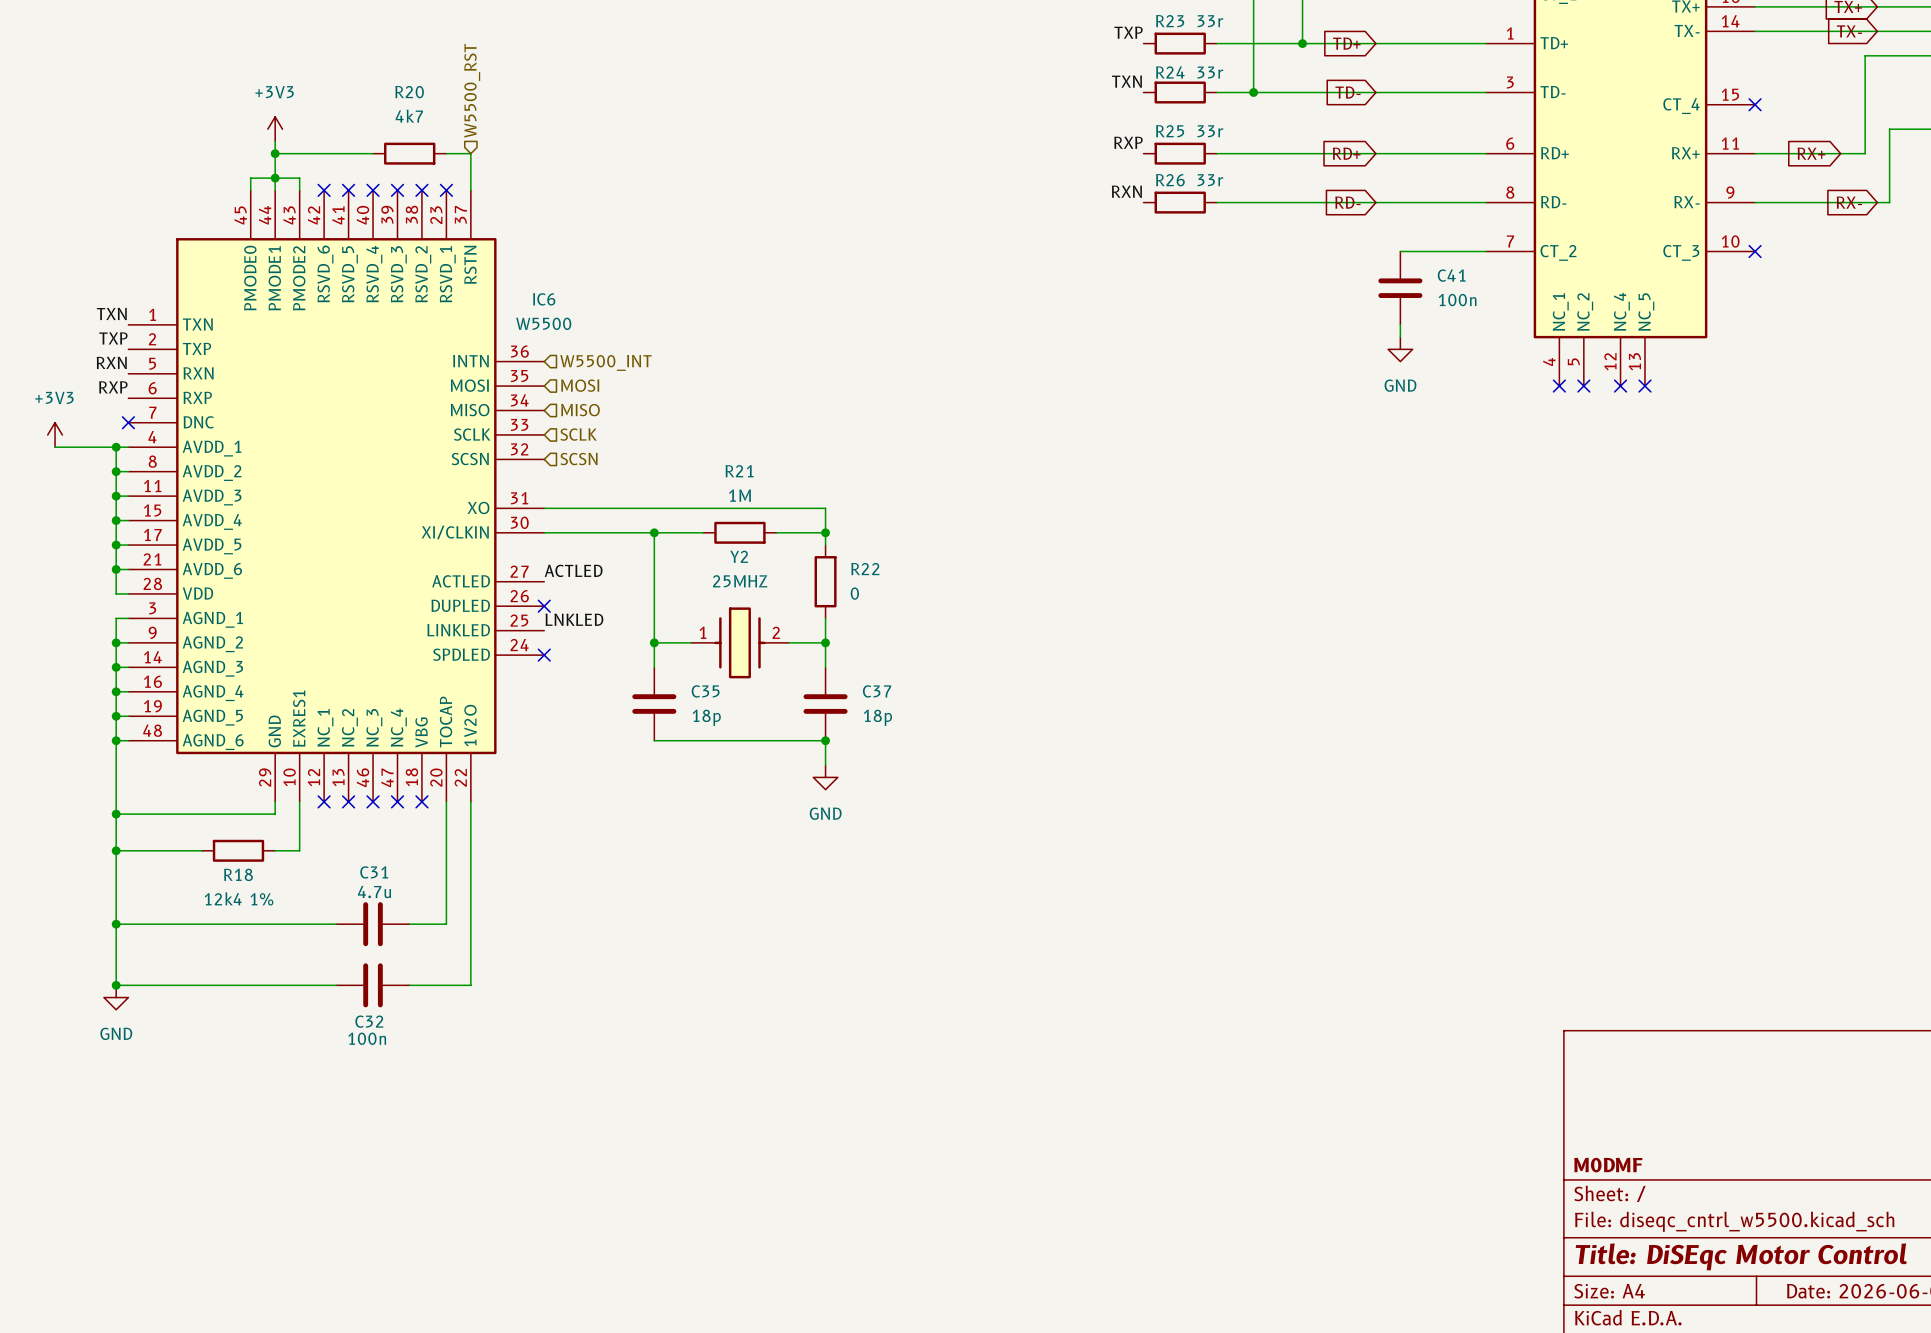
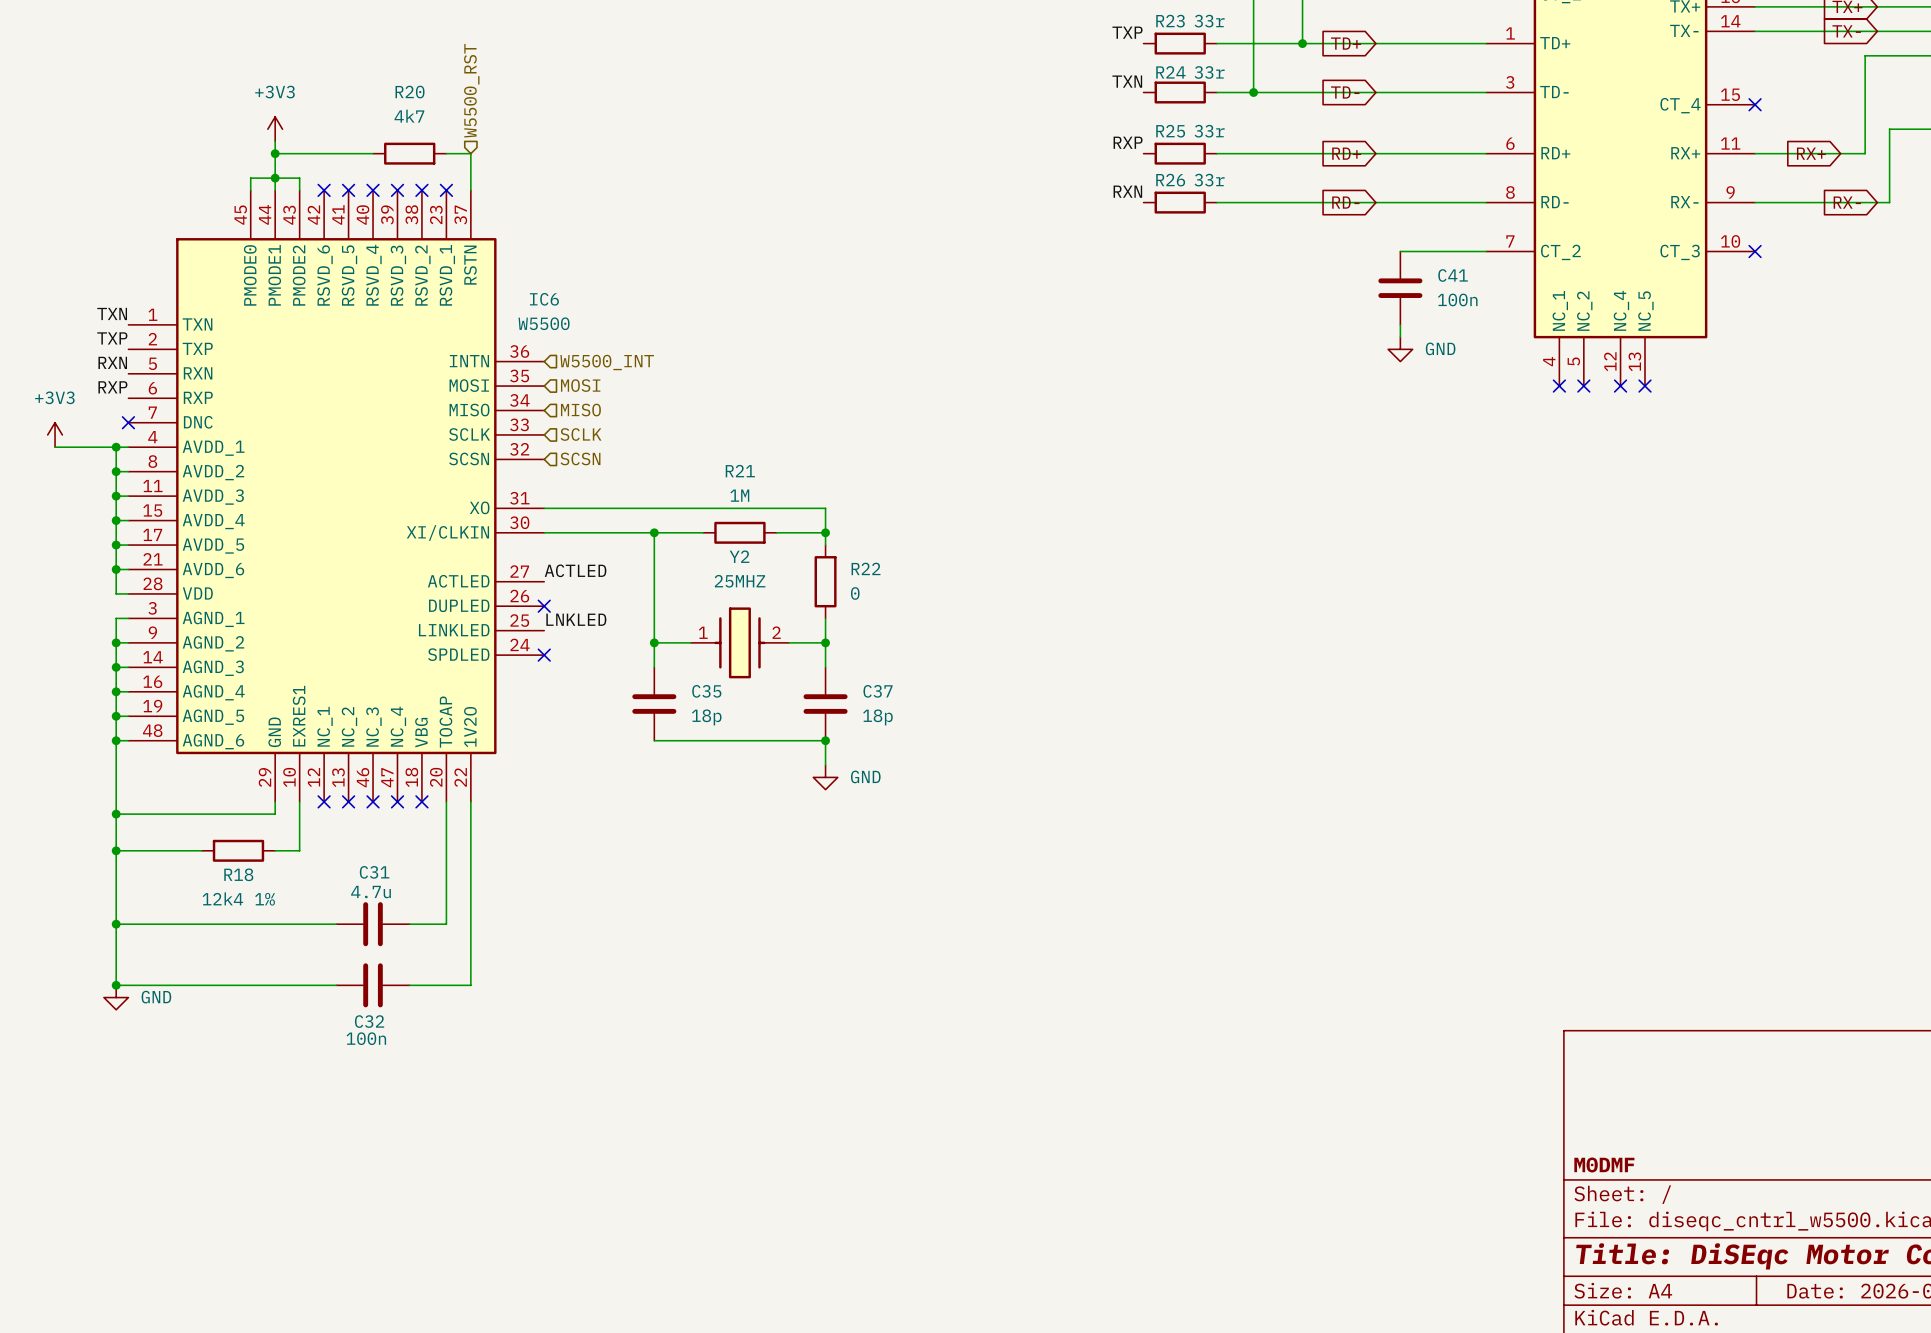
power symbol text position: GND (1400, 385) -> GND (1440, 348)
power symbol text position: GND (825, 813) -> GND (865, 776)
power symbol text position: GND (116, 1033) -> GND (156, 997)

